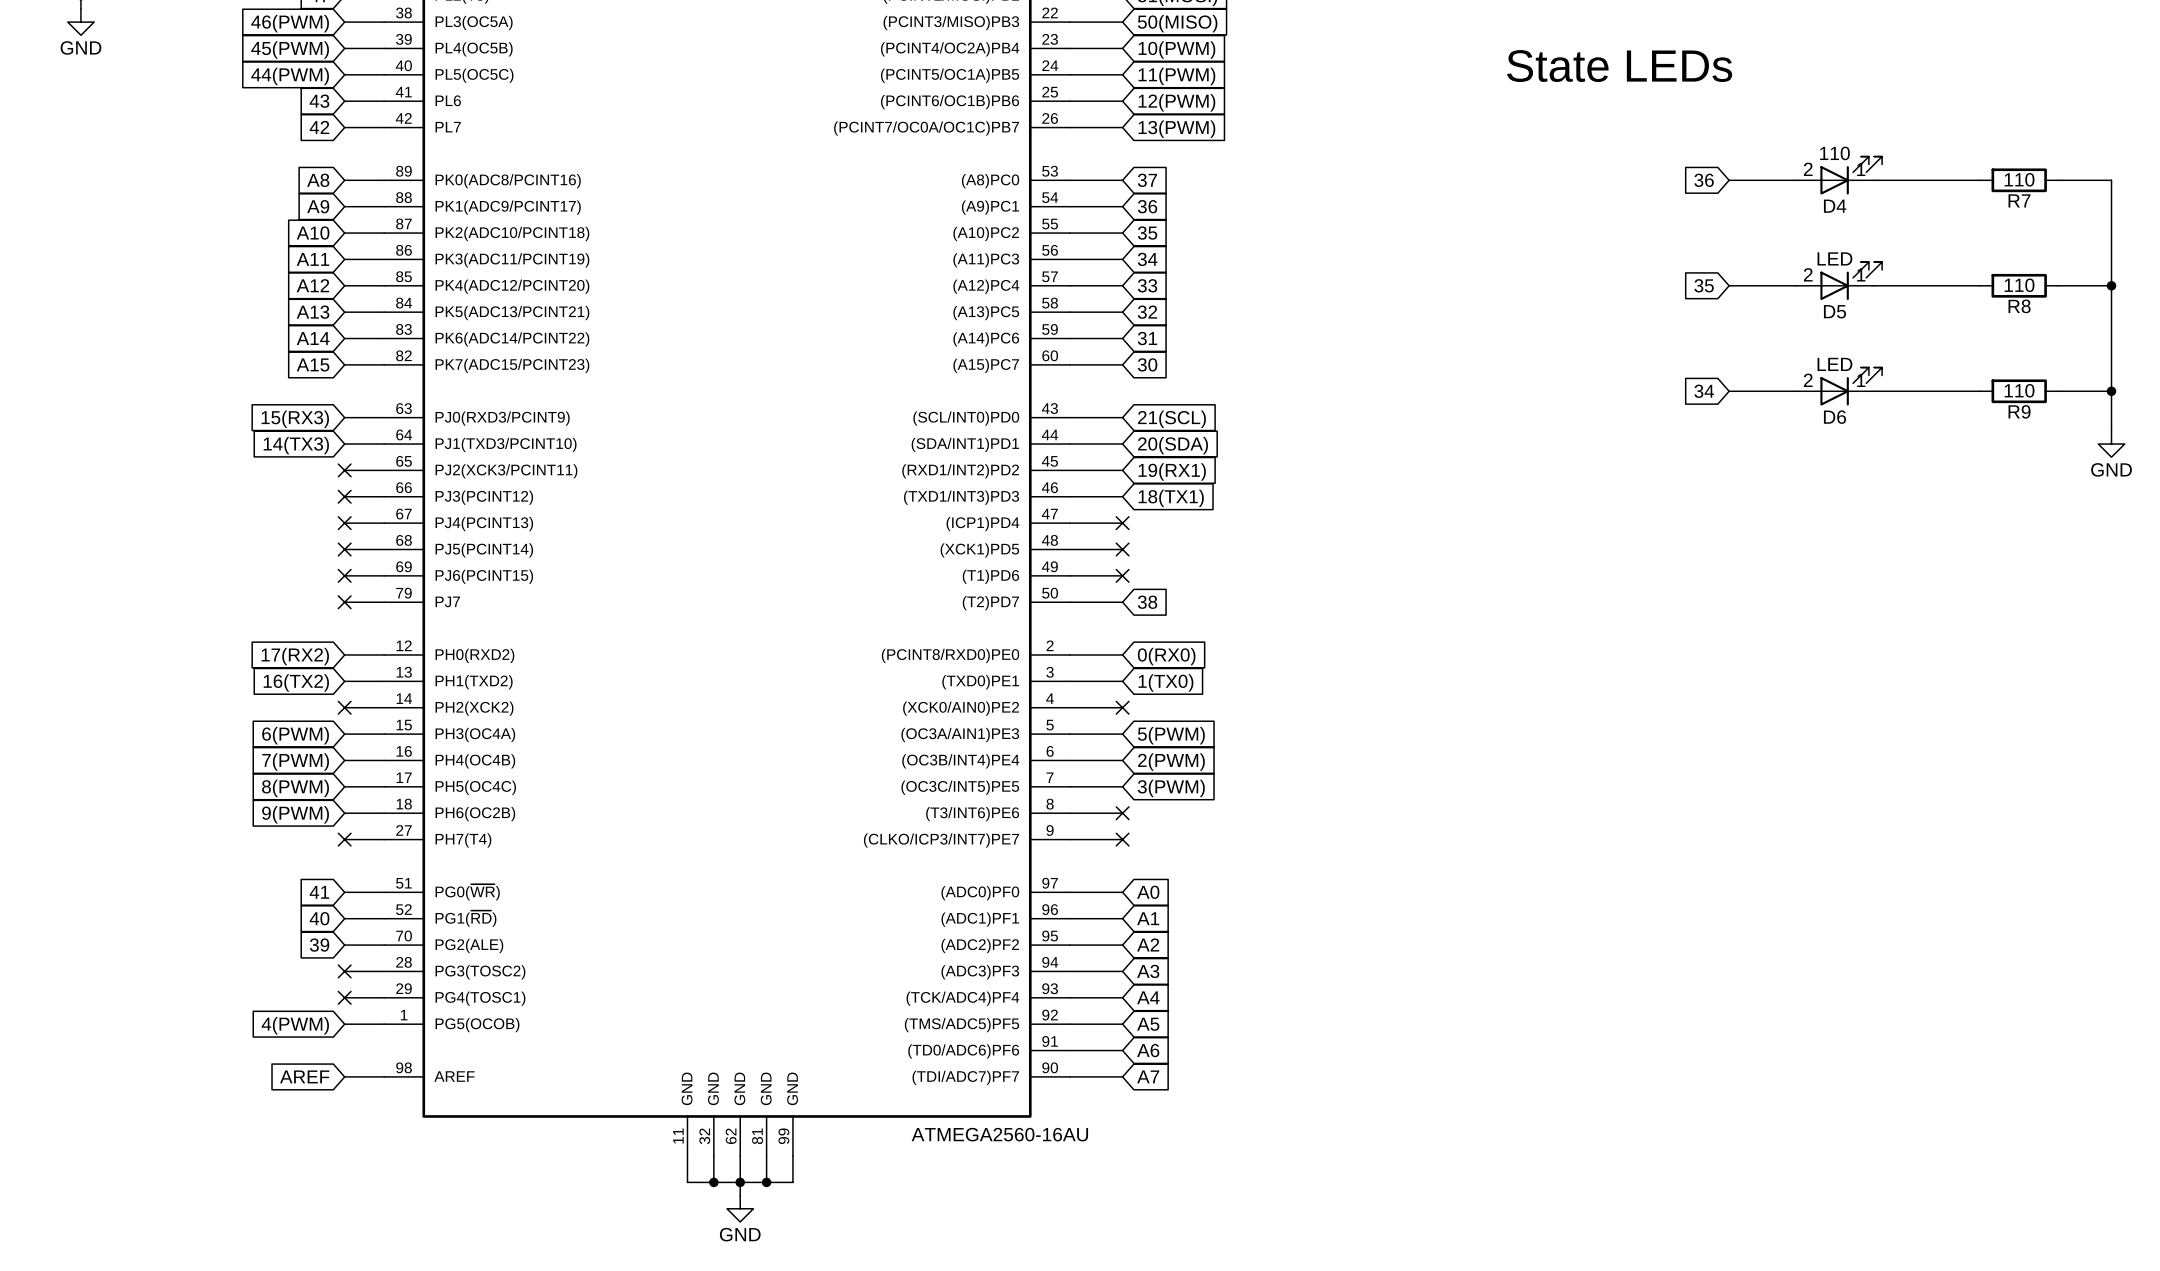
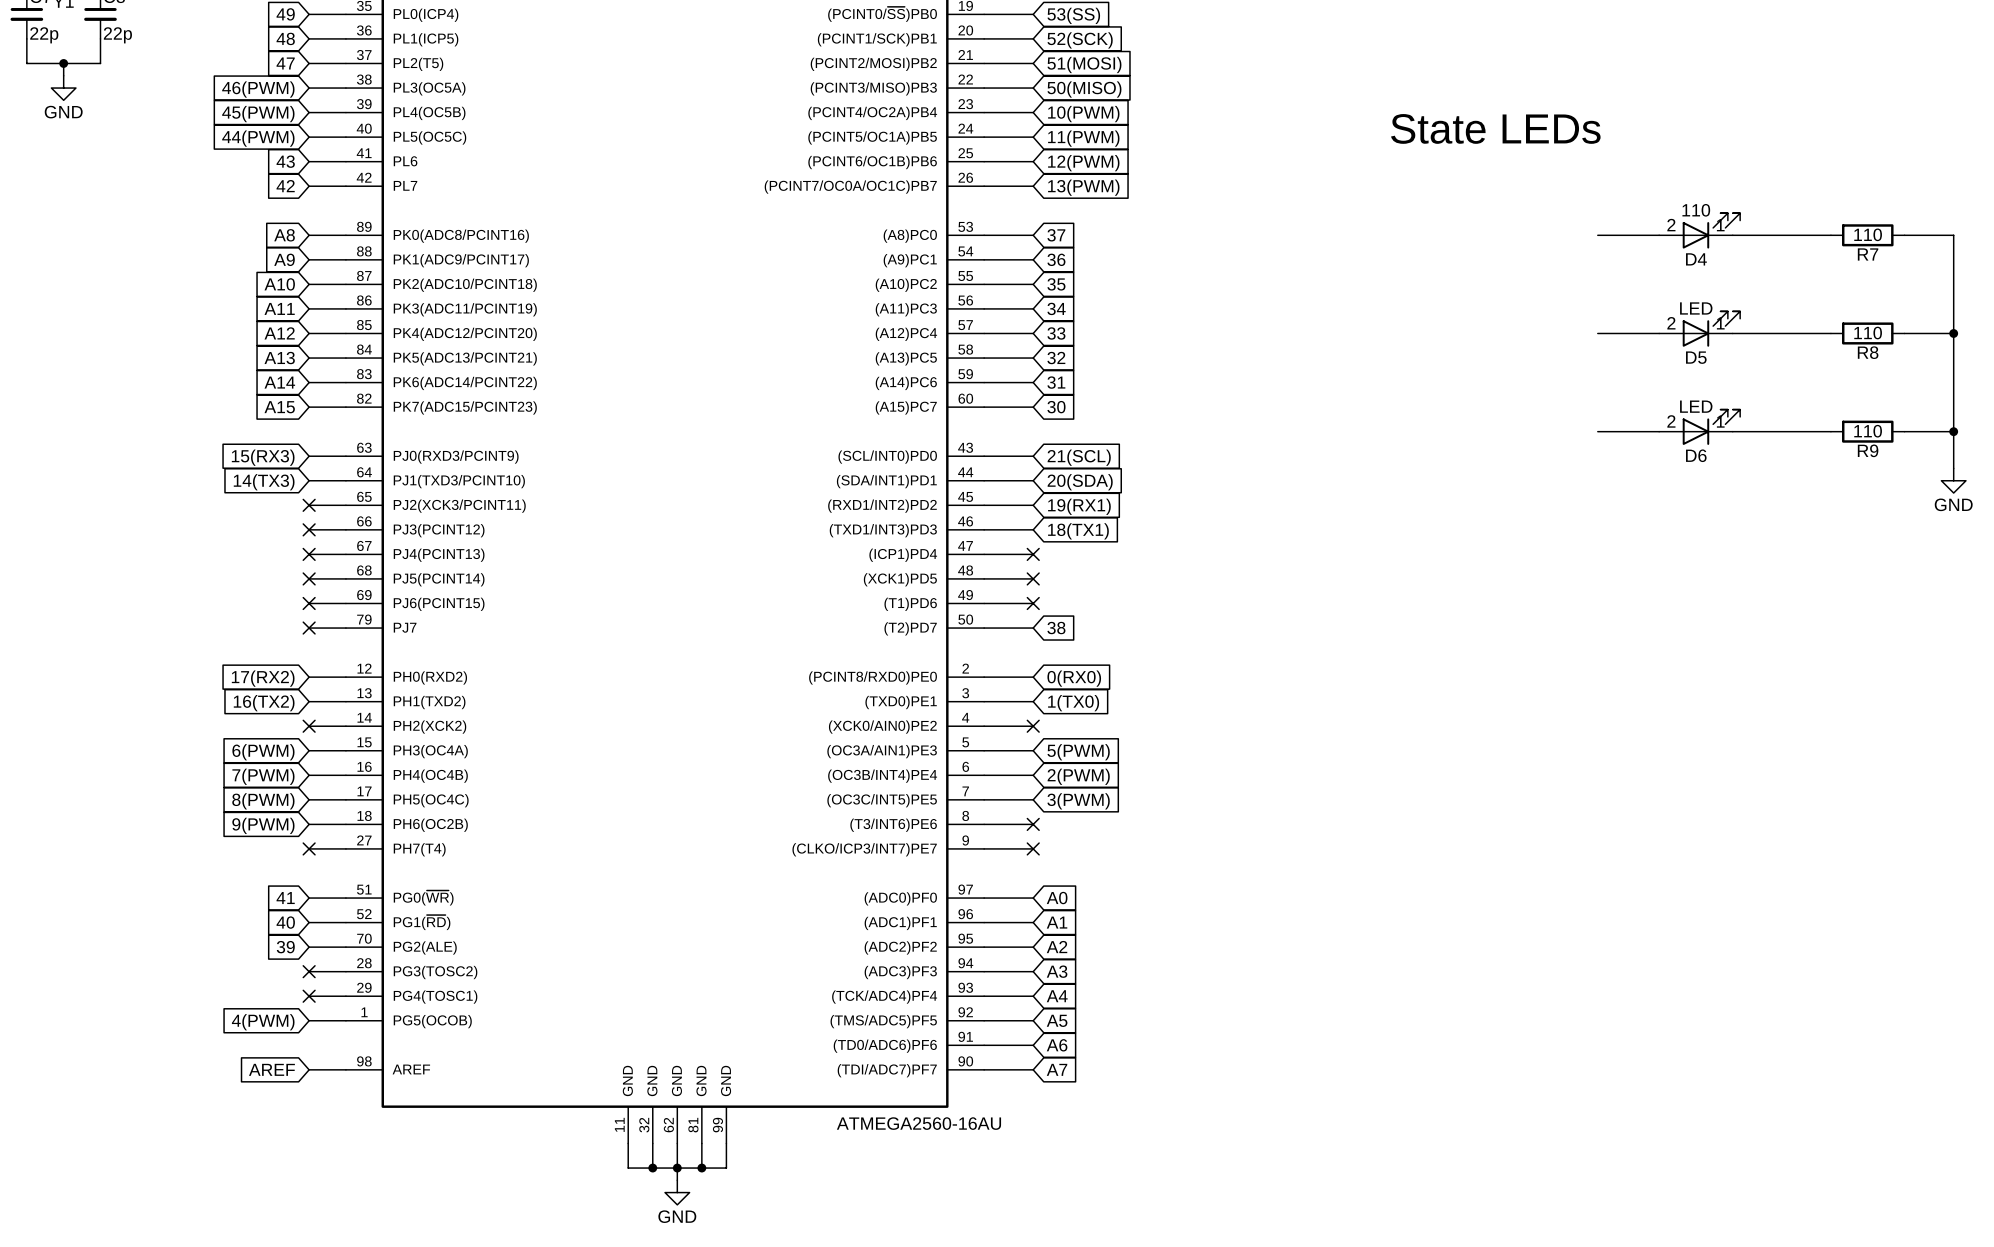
global label: 36 (1704, 180) -> none
global label: 35 (1704, 285) -> none
global label: 34 (1704, 391) -> none

